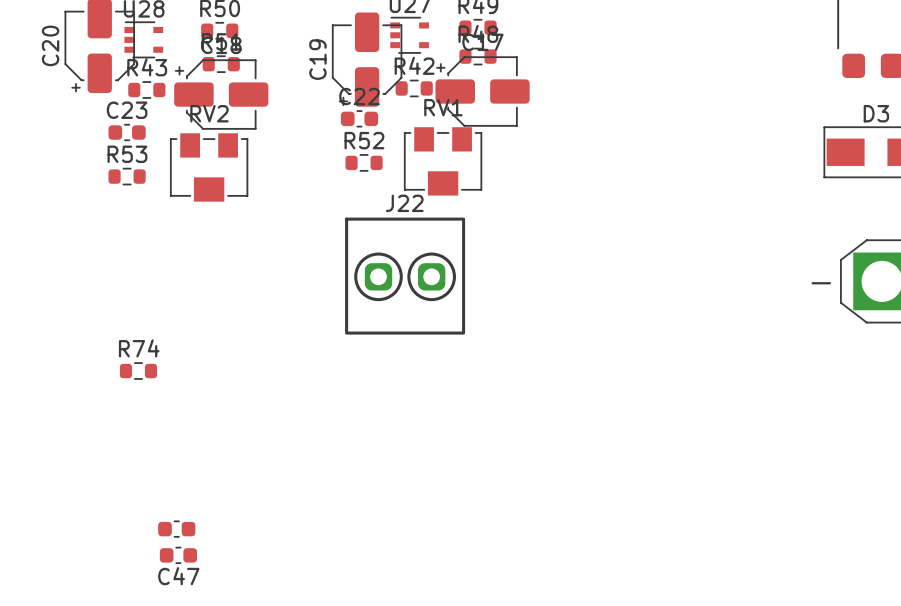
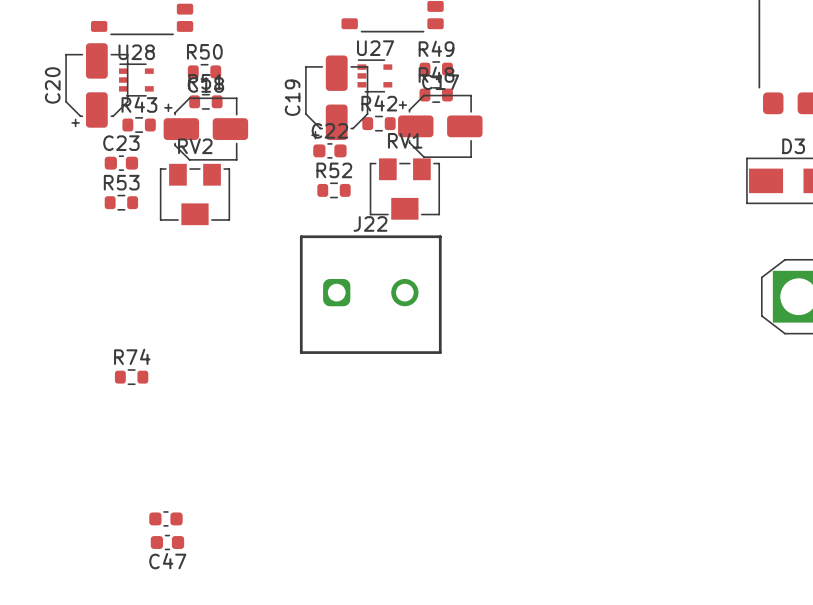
J22 footprint: [345, 217, 466, 335] -> [299, 235, 442, 354]
part text: - (821, 283) -> none

